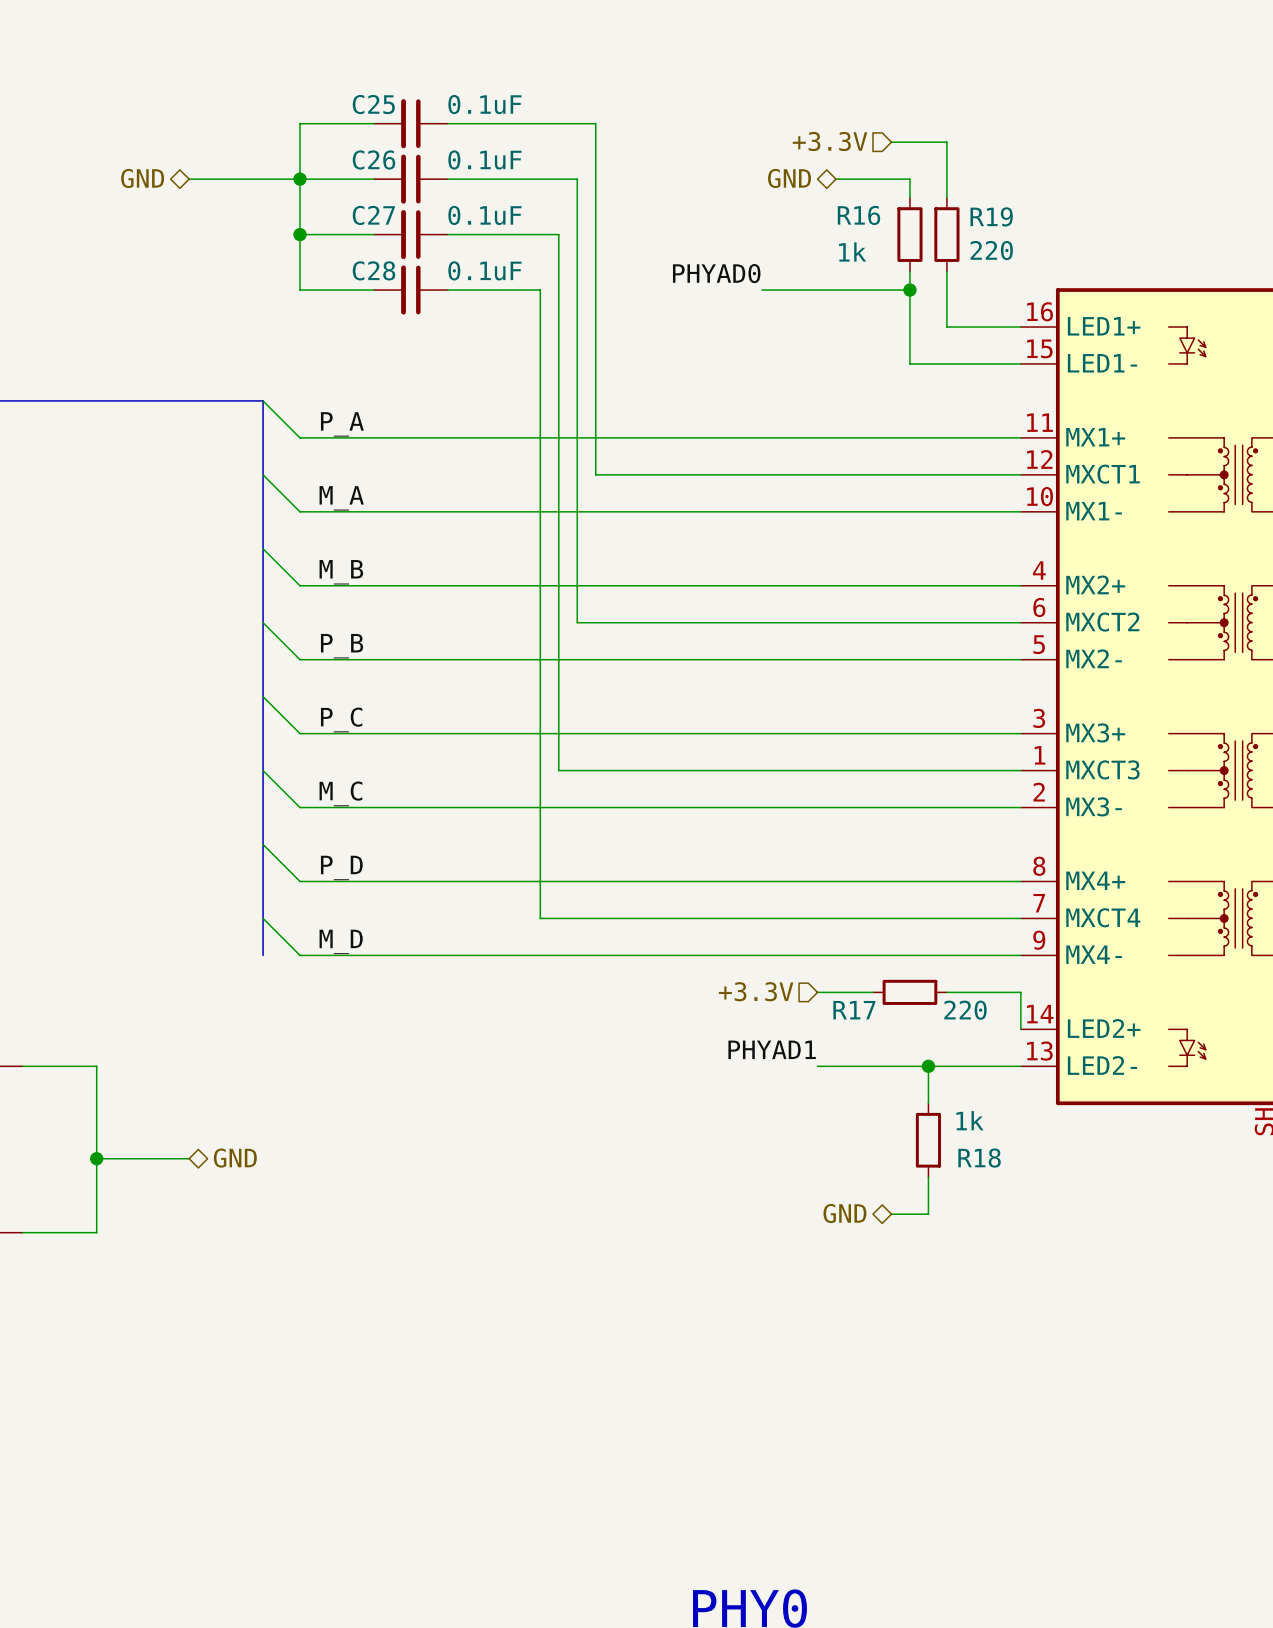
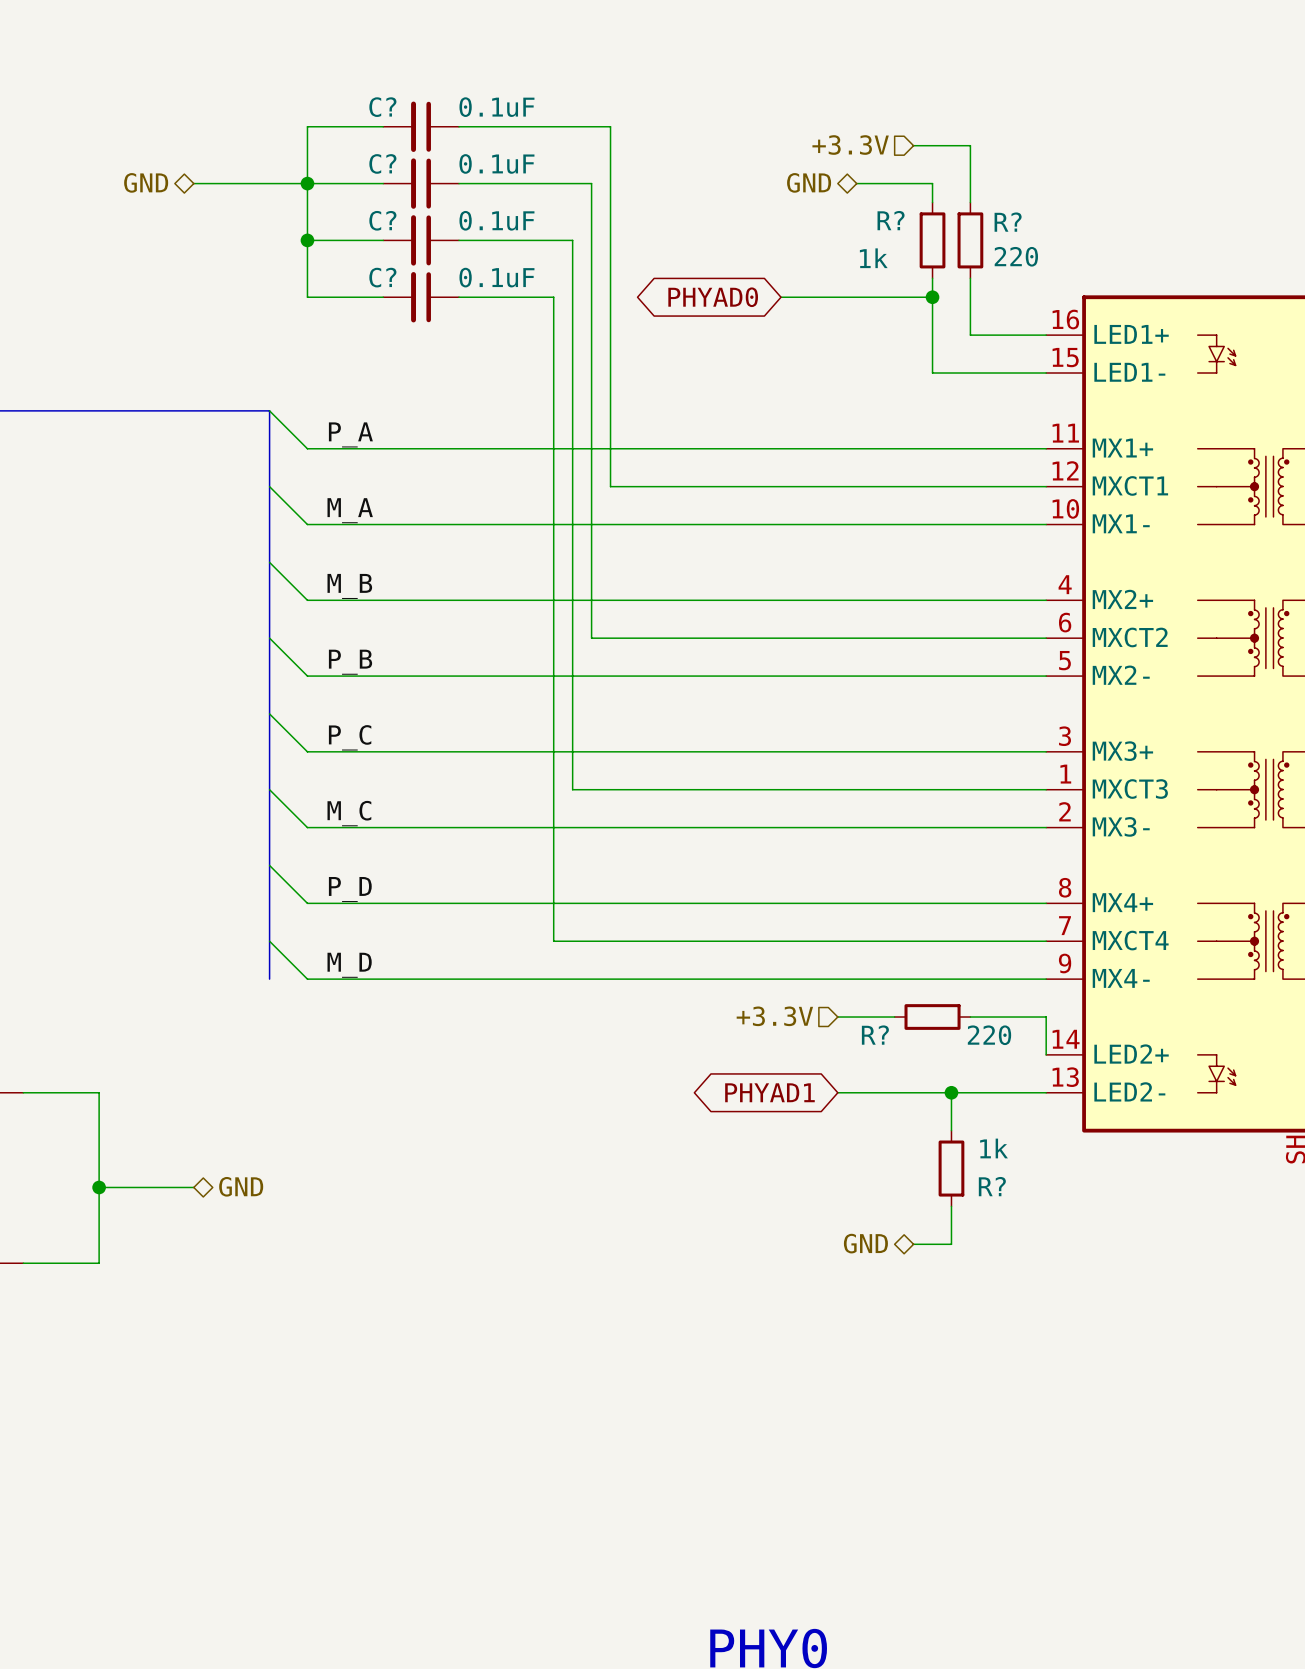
C25 name: C25 (373, 104) -> C? (382, 107)
C26 name: C26 (373, 159) -> C? (382, 163)
C27 name: C27 (373, 215) -> C? (382, 220)
R16 name: R16 (858, 215) -> R? (891, 220)
R19 name: R19 (991, 216) -> R? (1008, 222)
C28 name: C28 (374, 270) -> C? (382, 277)
label: PHYAD0 (716, 273) -> none
global label: none -> PHYAD0 (713, 297)
R17 name: R17 (854, 1010) -> R? (875, 1035)
label: PHYAD1 (772, 1049) -> none
global label: none -> PHYAD1 (769, 1092)
R18 name: R18 (979, 1158) -> R? (992, 1186)

